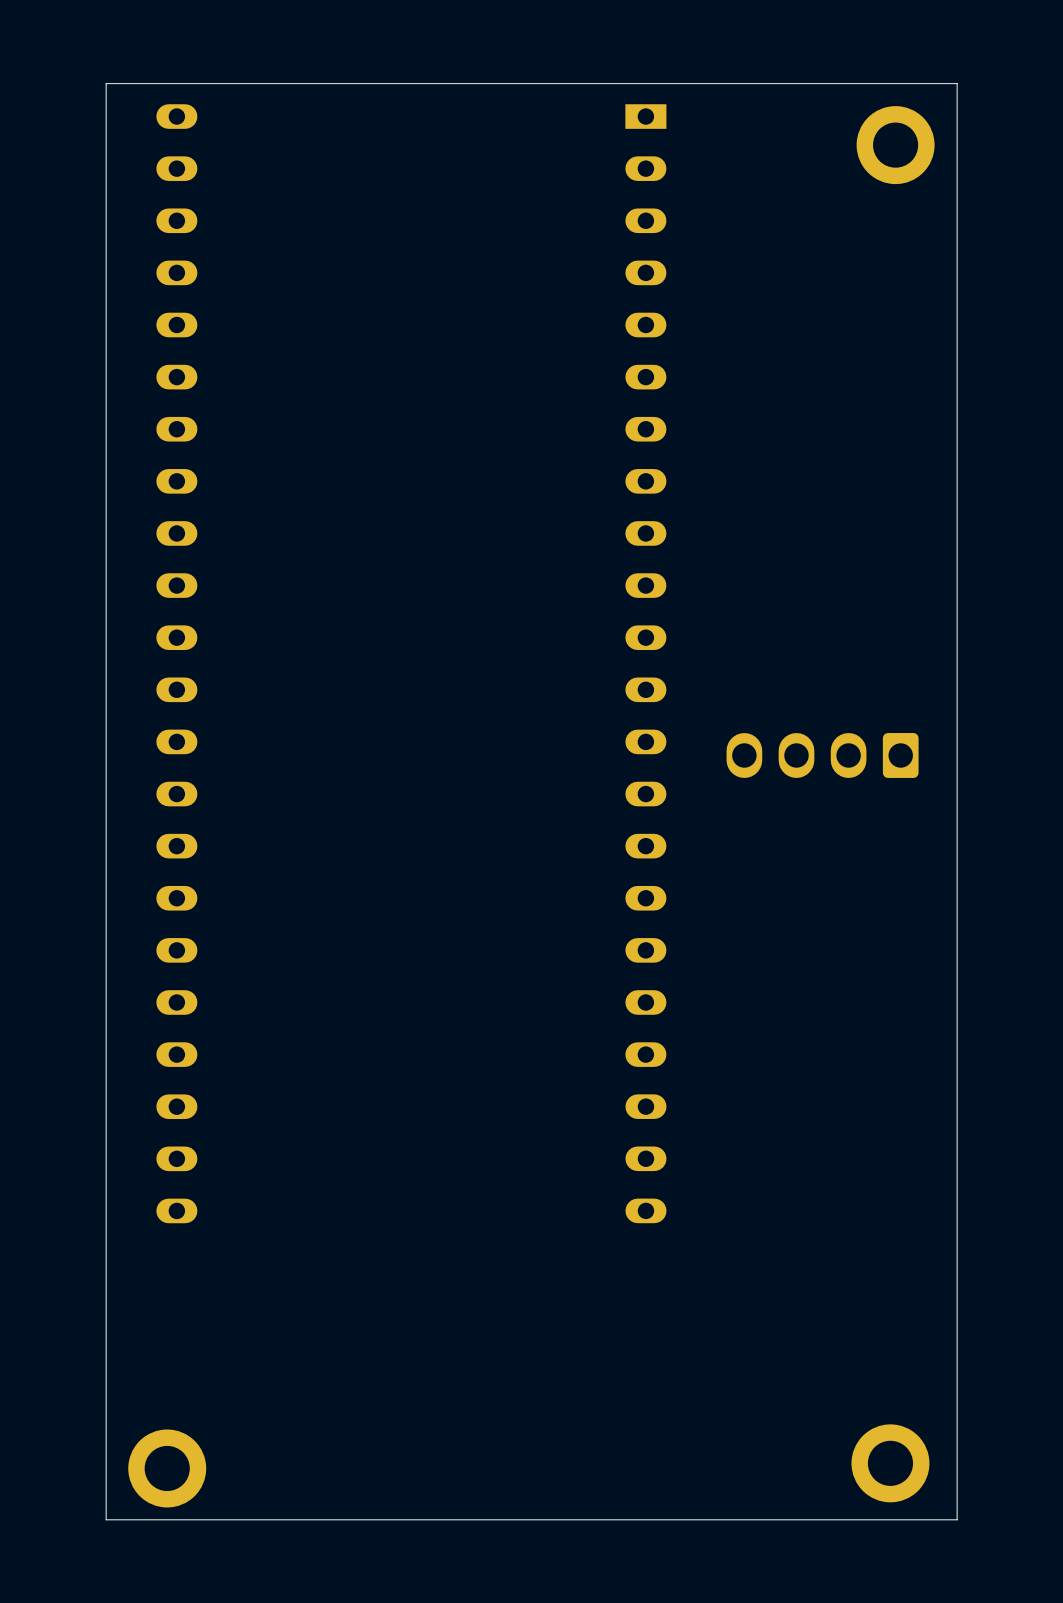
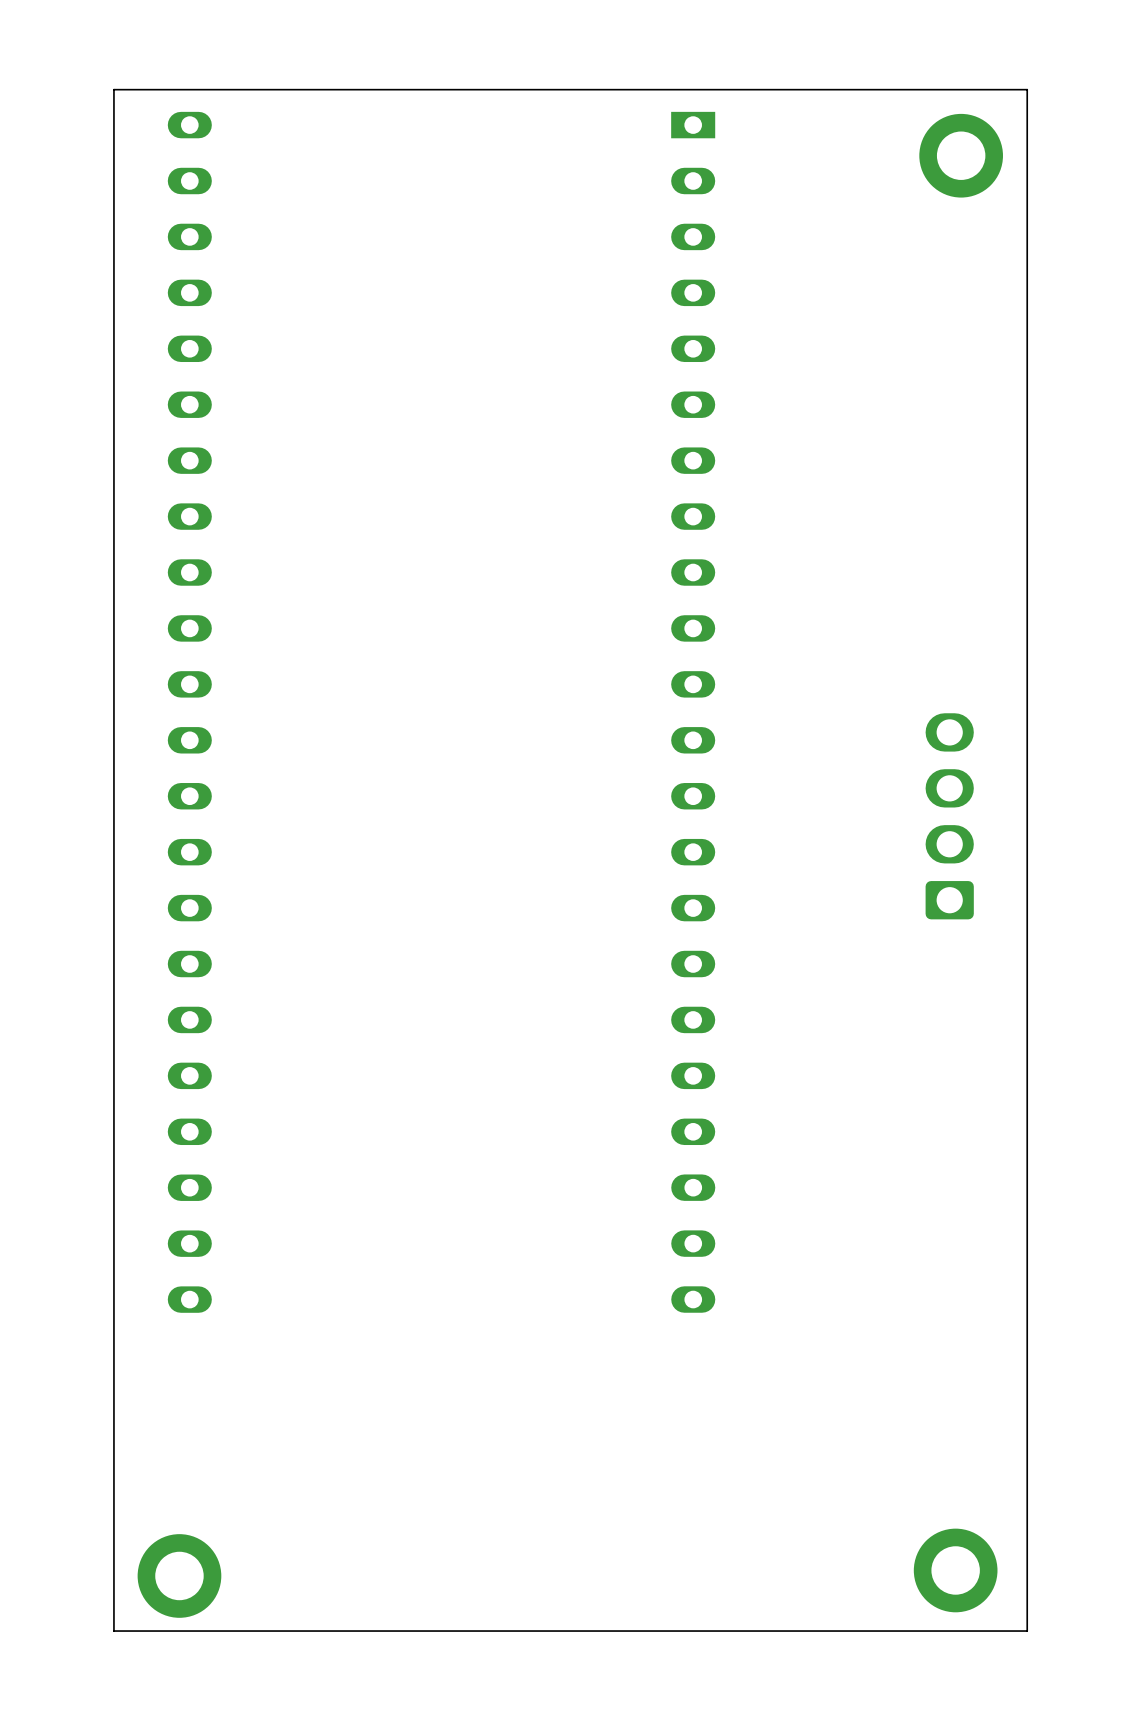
part rotation: 0° (822, 755) -> 90° clockwise (949, 816)

